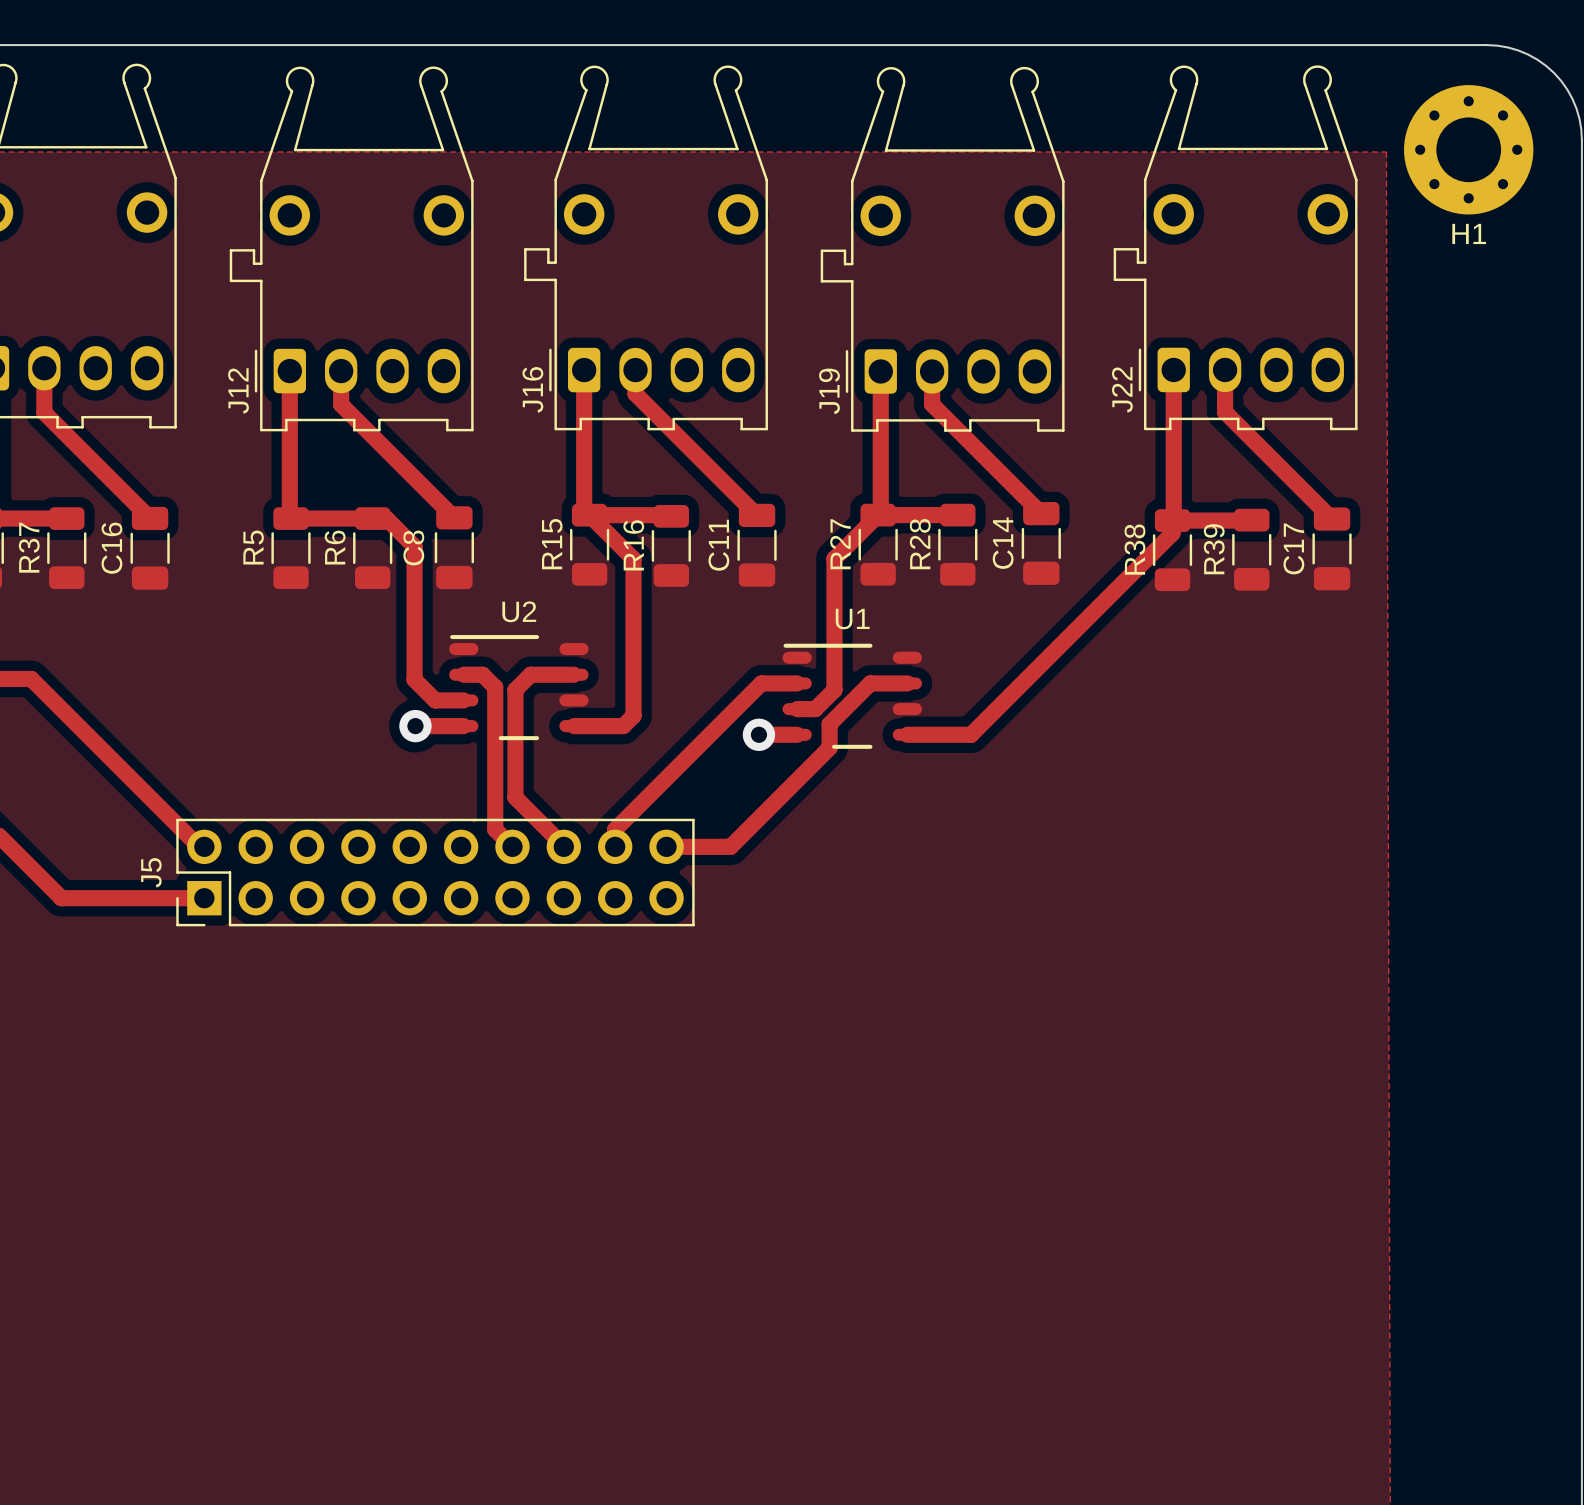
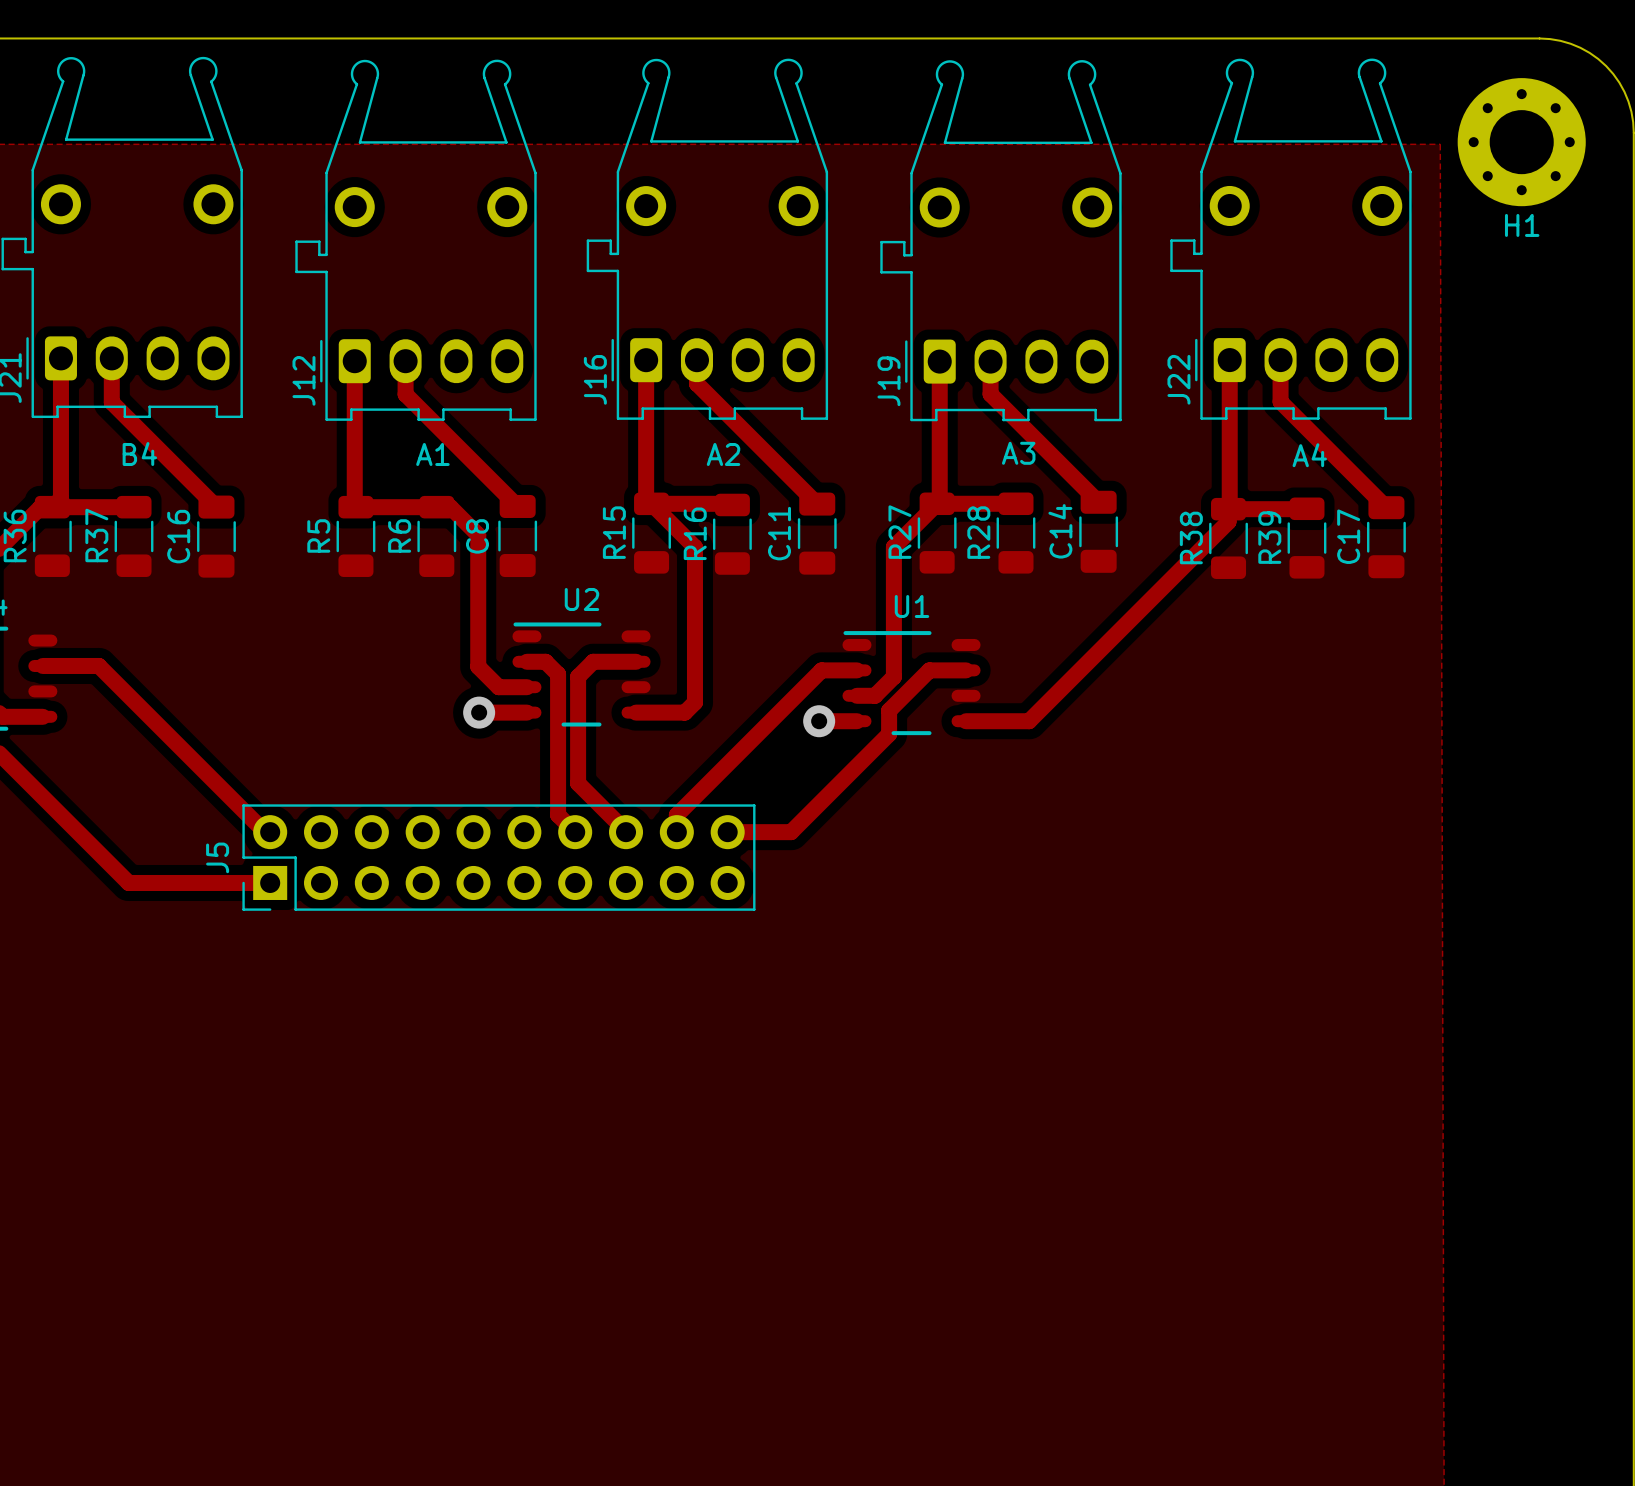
text: none -> A3 (1018, 453)
text: none -> B4 (139, 454)
text: none -> A1 (432, 454)
text: none -> A2 (723, 454)
text: none -> A4 (1309, 455)

